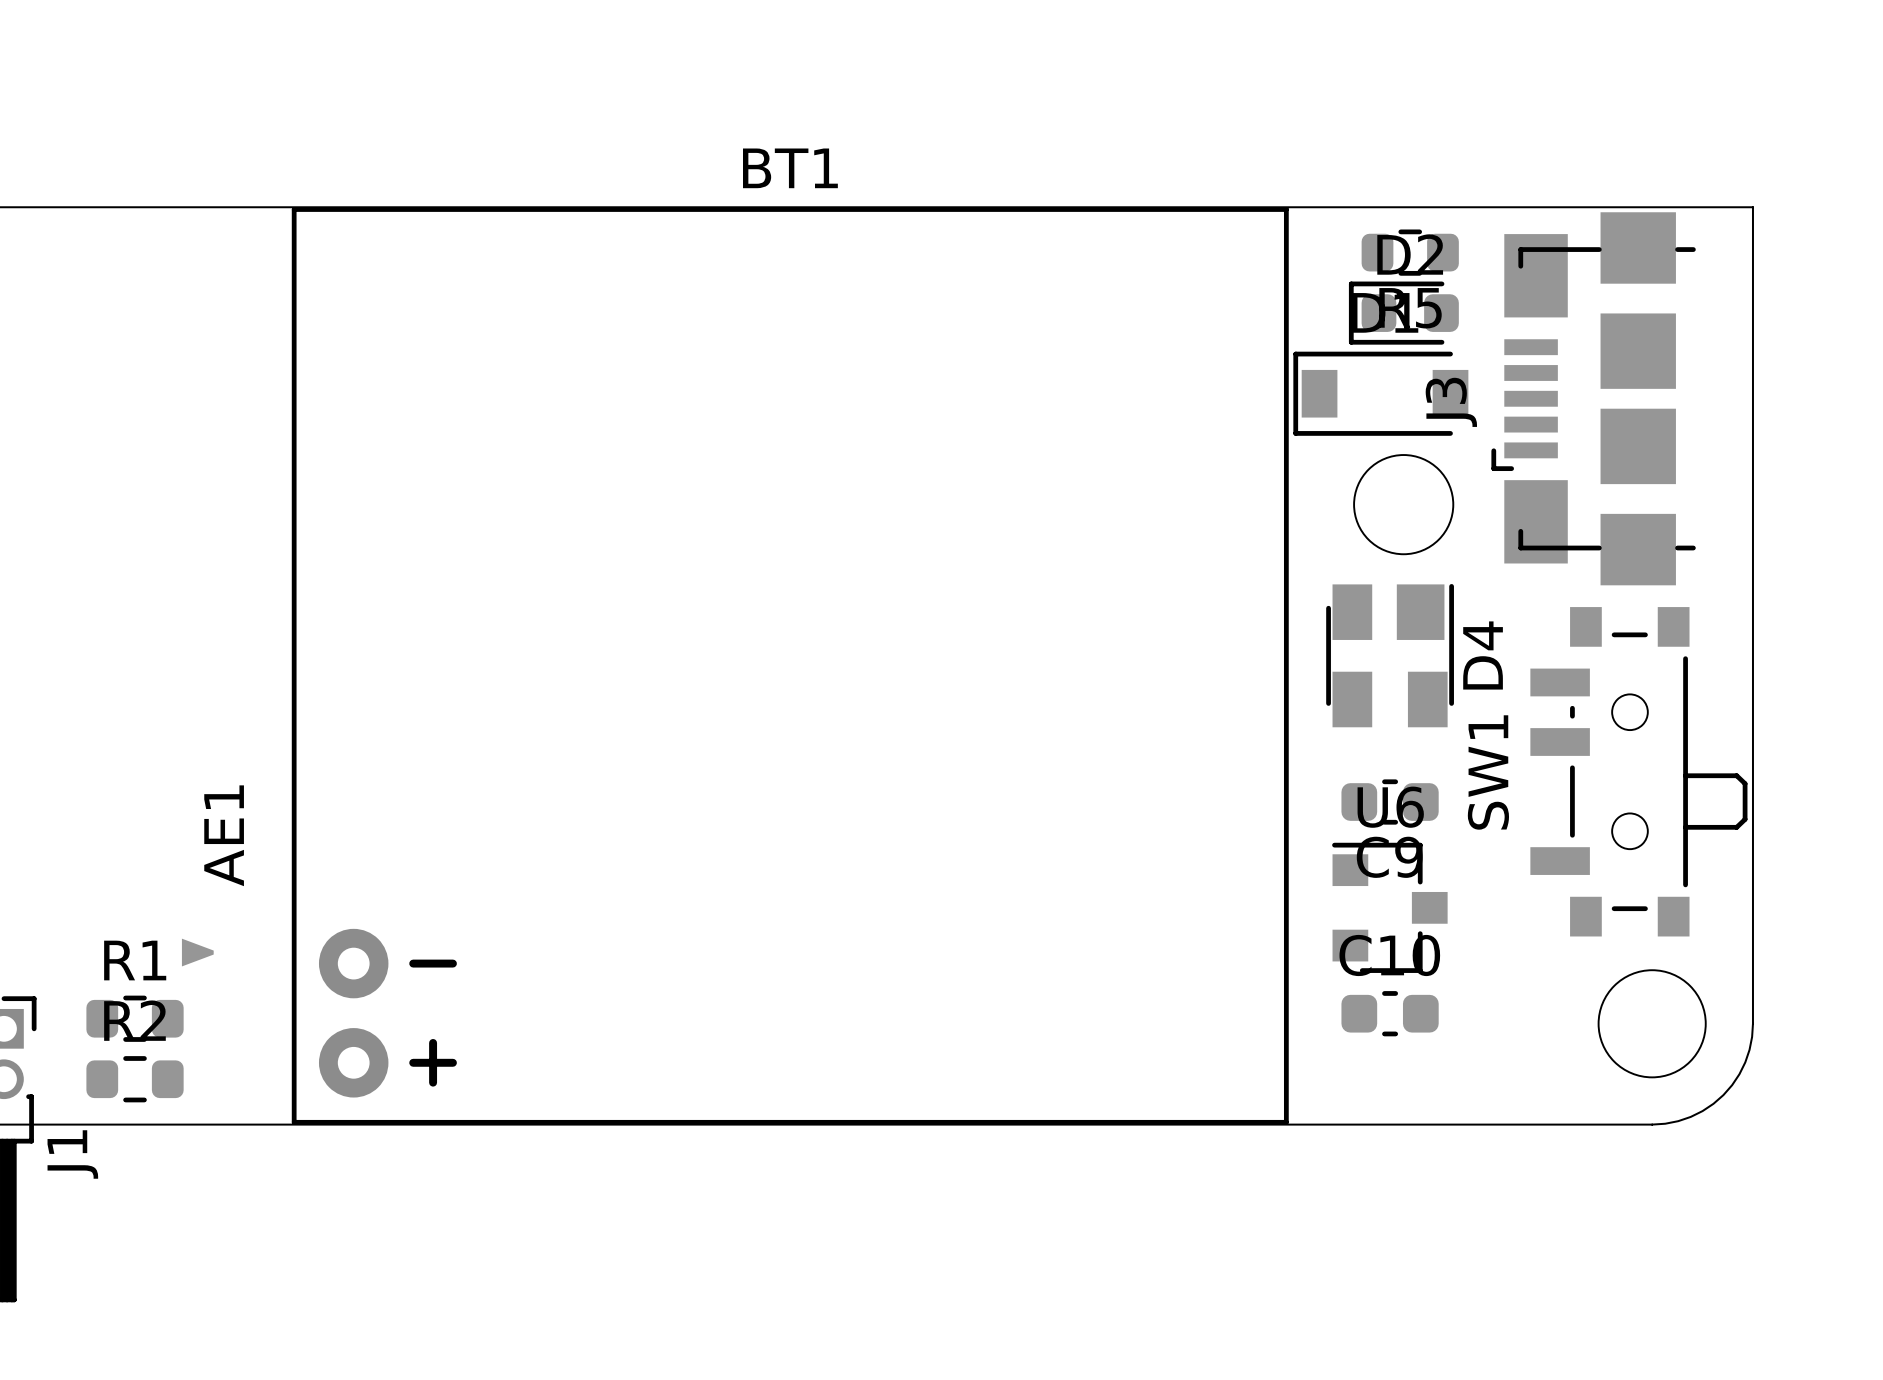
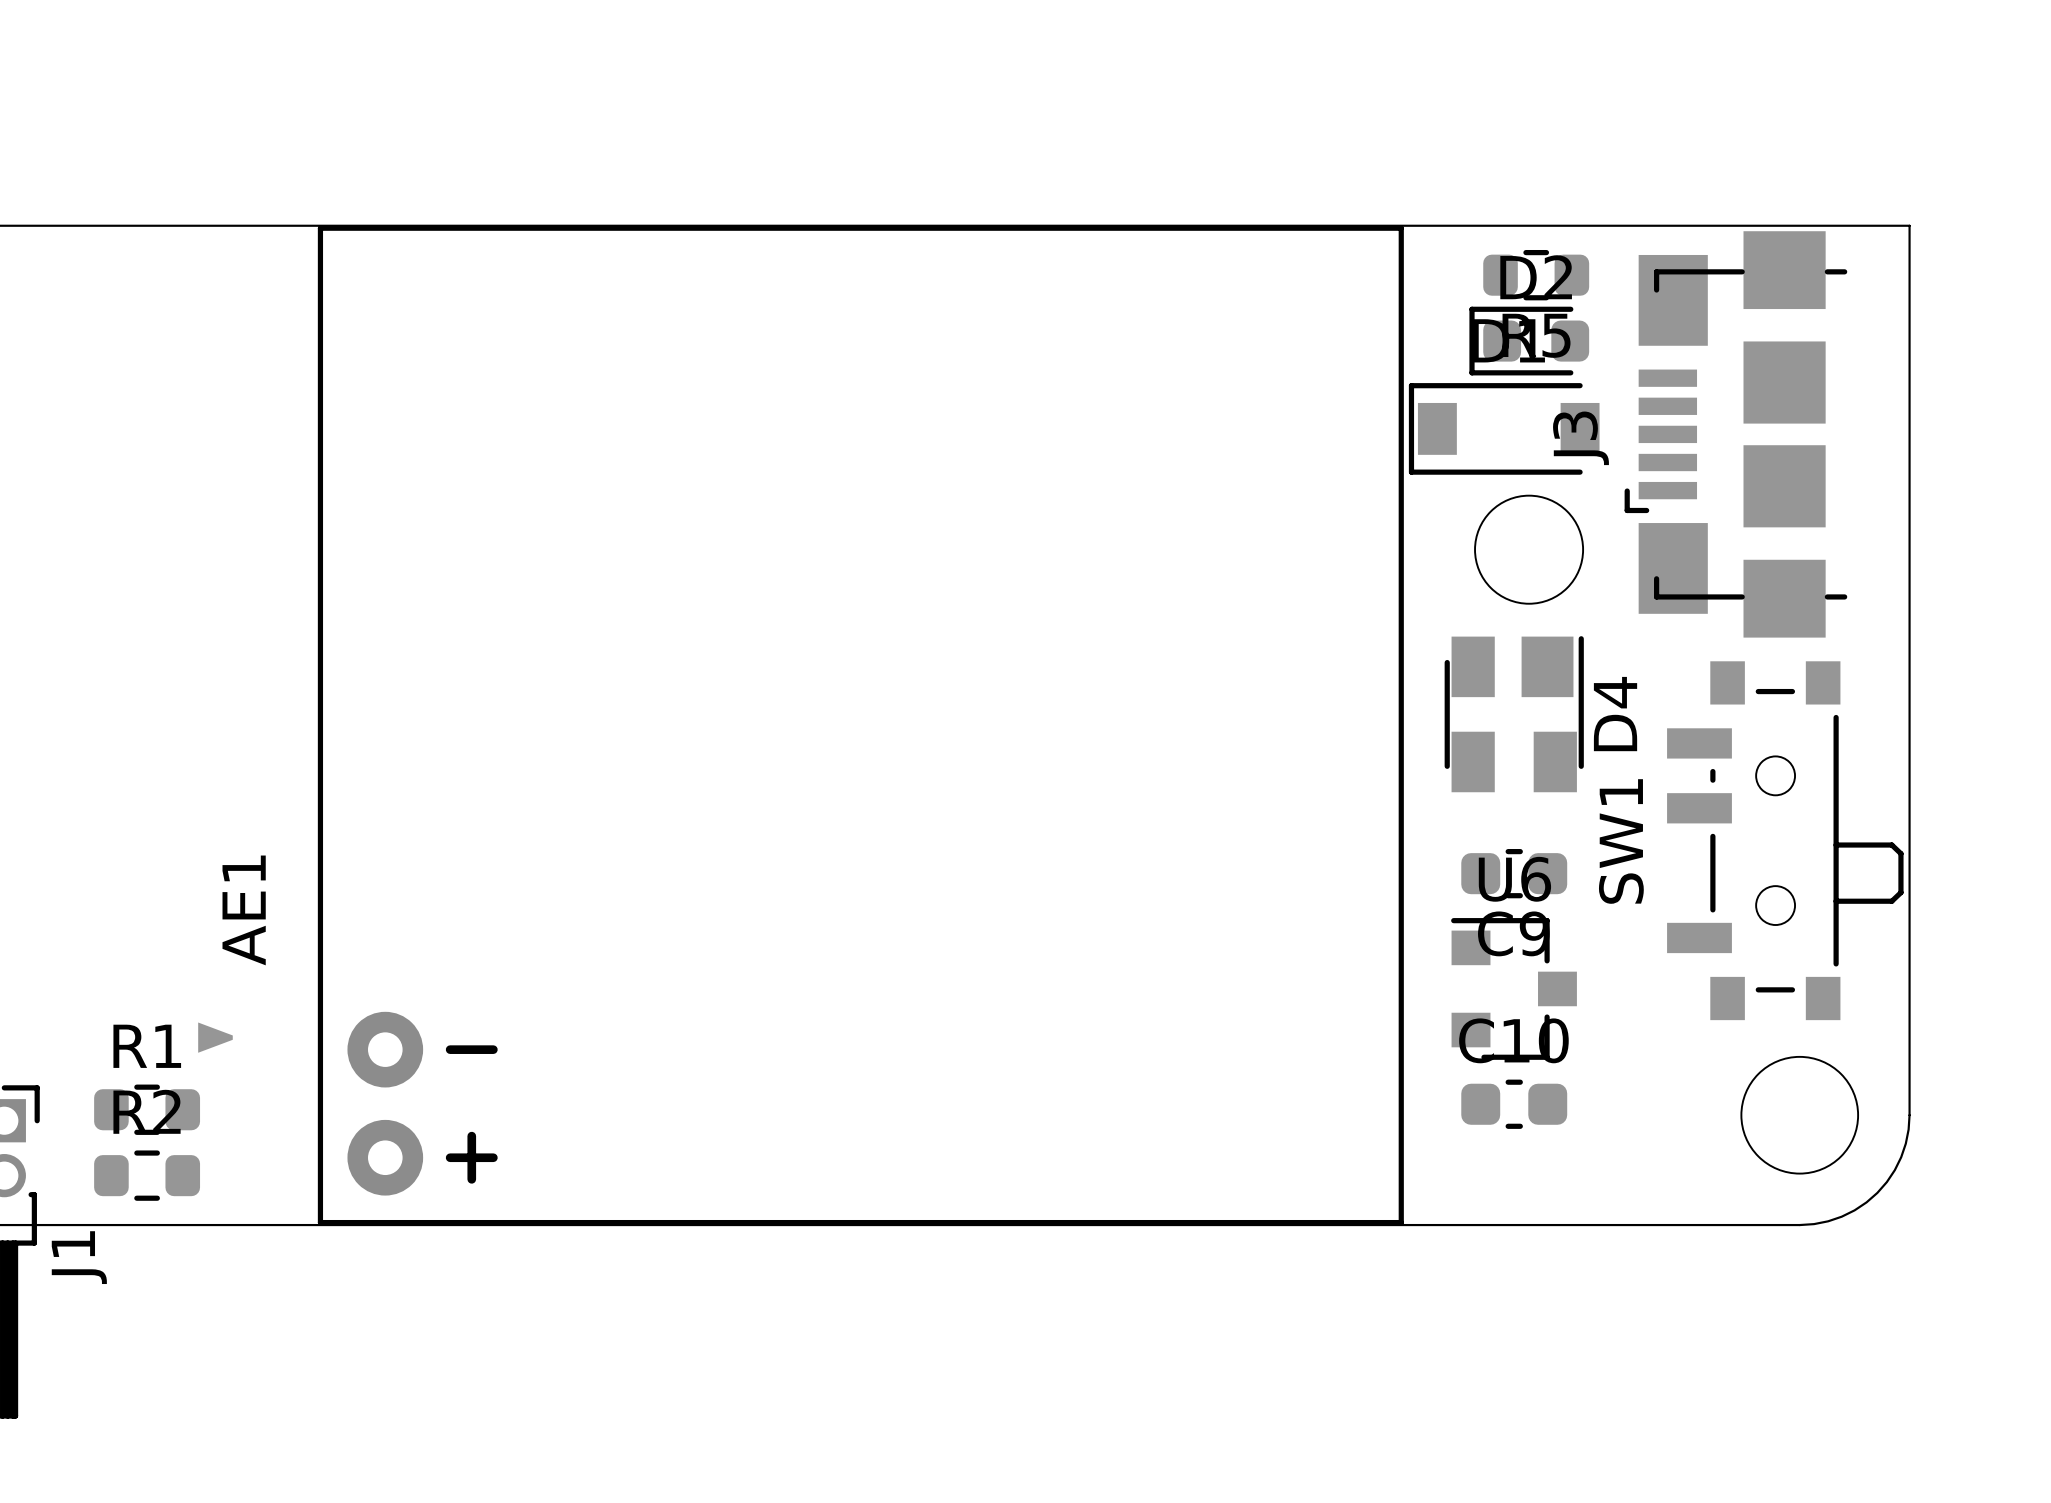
BT1 name: BT1 (790, 168) -> none

